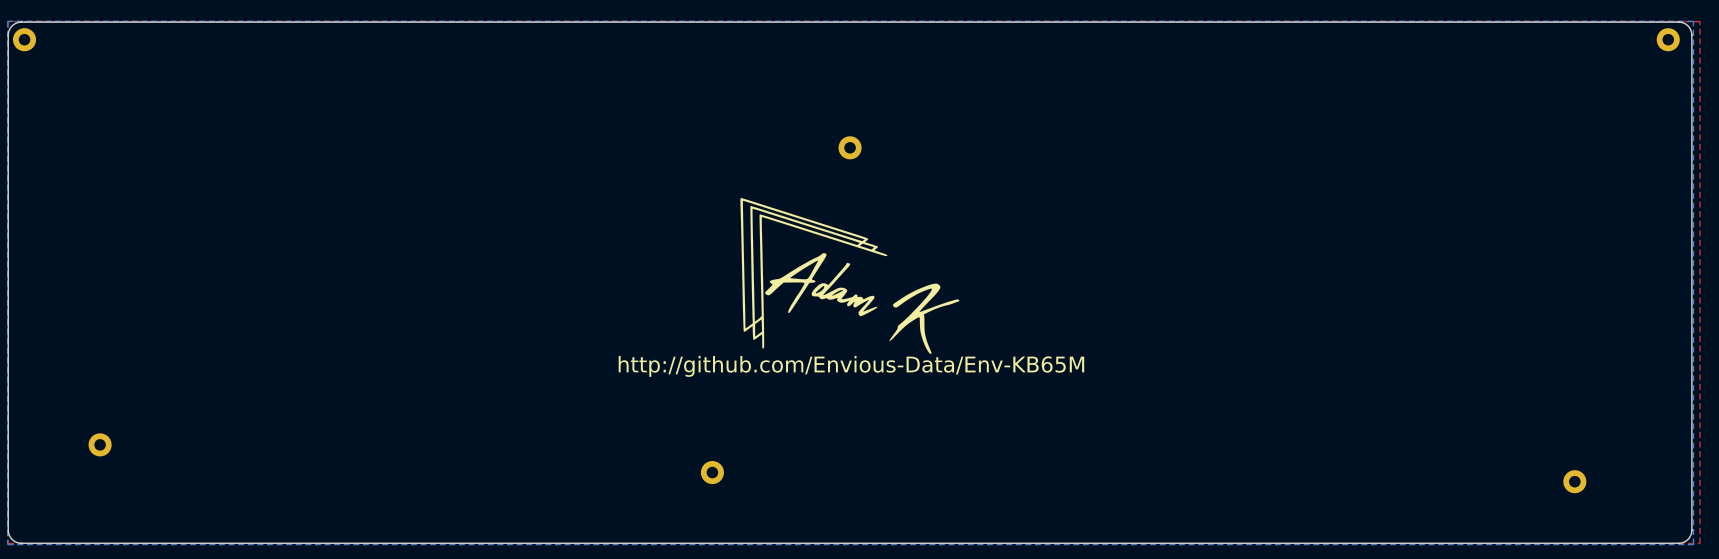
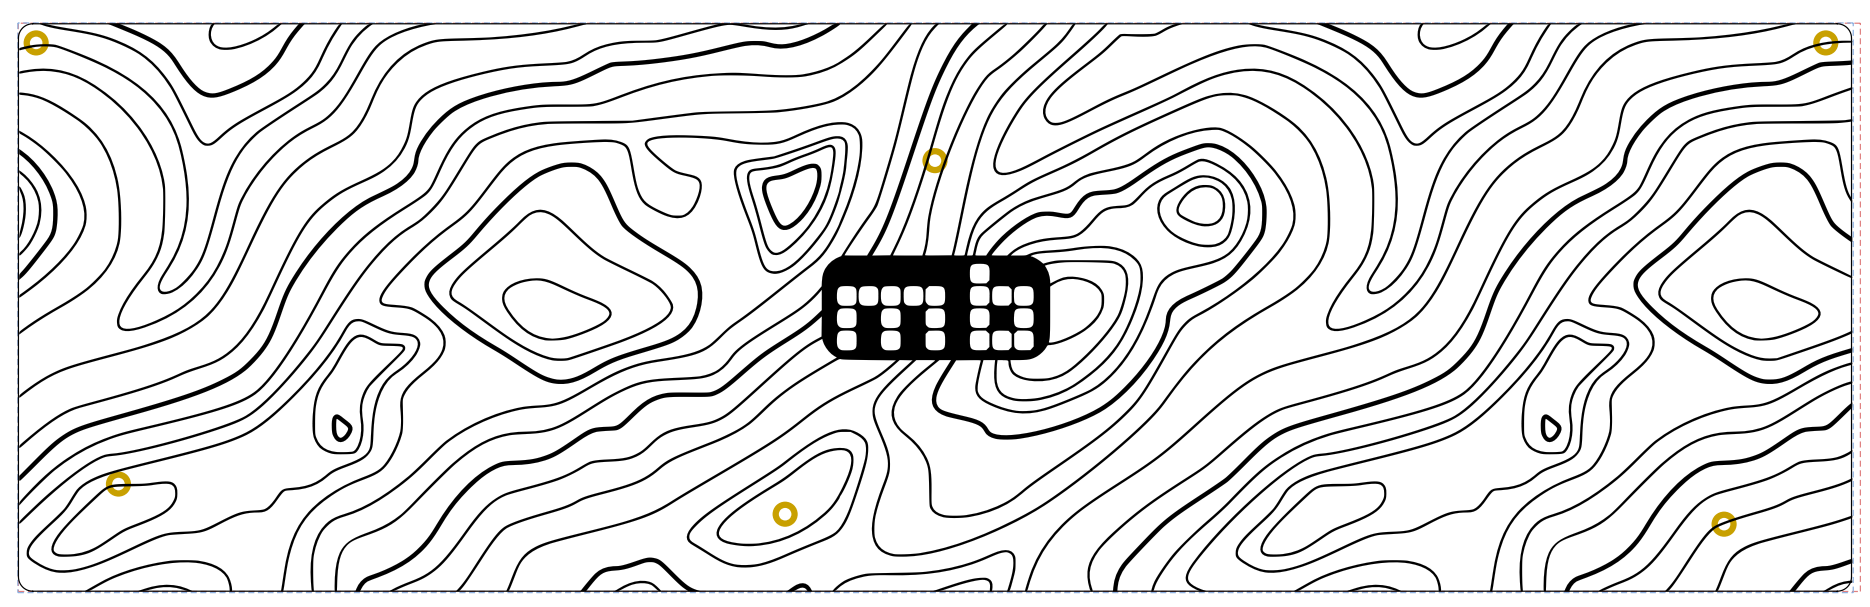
drawing: none -> [19, 23, 1853, 592]
drawing: [740, 197, 960, 354] -> none
text: http://github.com/Envious-Data/Env-KB65M (851, 366) -> none

